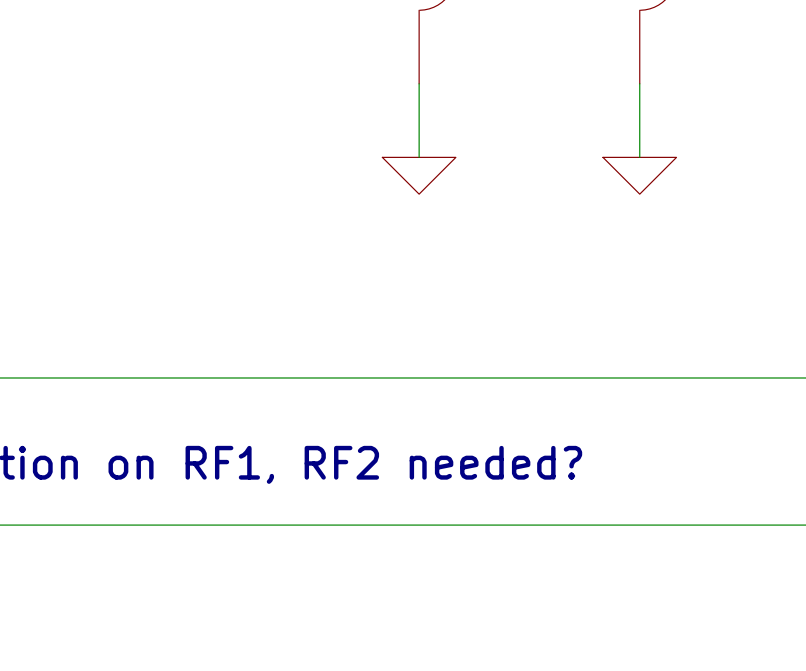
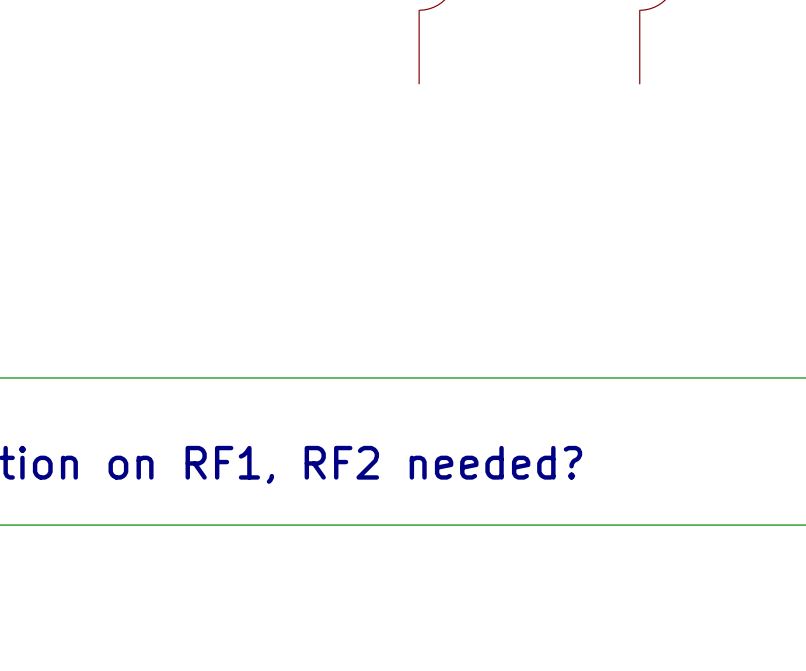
wire: (419, 83) (419, 157) -> none
wire: (639, 83) (639, 157) -> none
power symbol: (419, 175) -> none
power symbol: (639, 175) -> none

